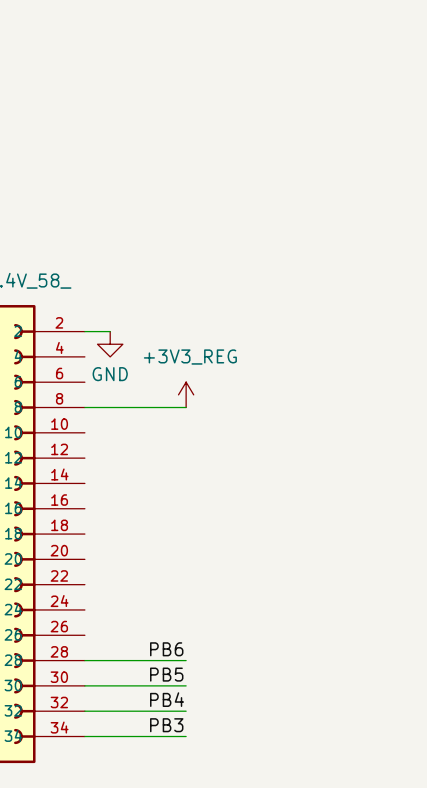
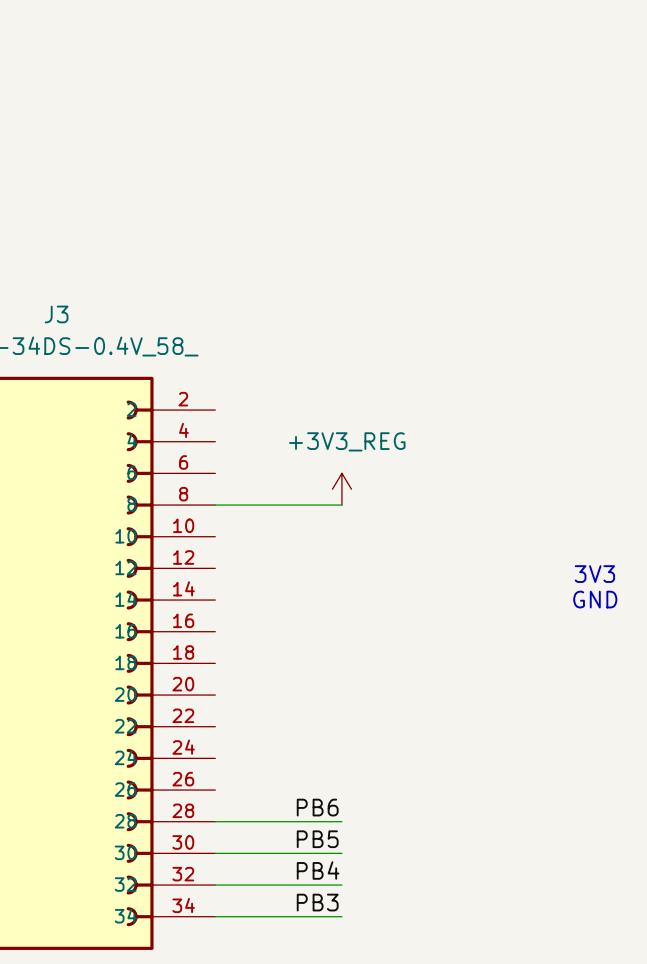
wire: (84, 331) (110, 331) -> none
power symbol: GND (110, 344) -> none
text: none -> 3V3 (594, 574)
text: none -> GND (595, 599)

